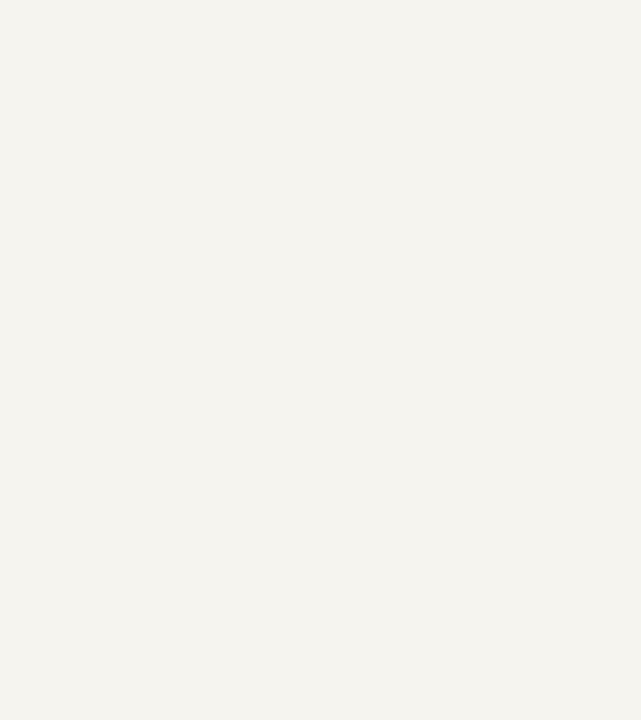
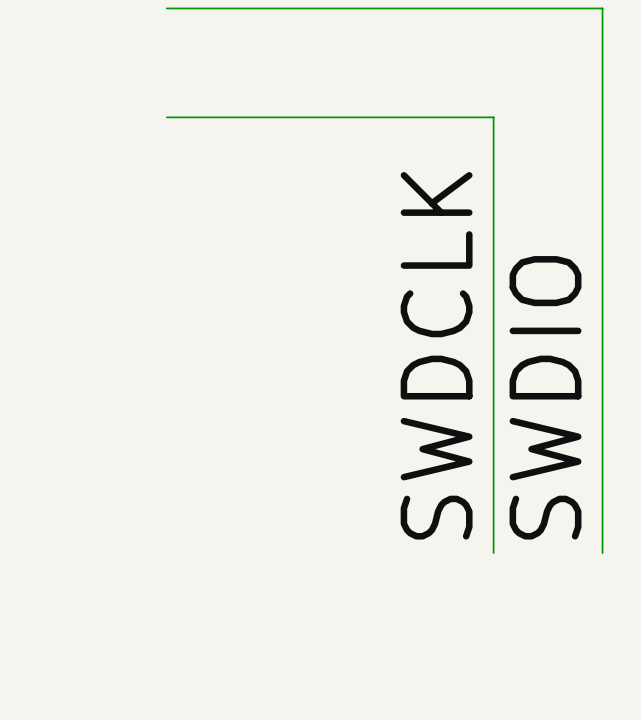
wire: none -> (166, 8) (602, 8) (602, 553)
wire: none -> (166, 117) (493, 117) (493, 553)
label: none -> SWDCLK (436, 355)
label: none -> SWDIO (545, 397)

